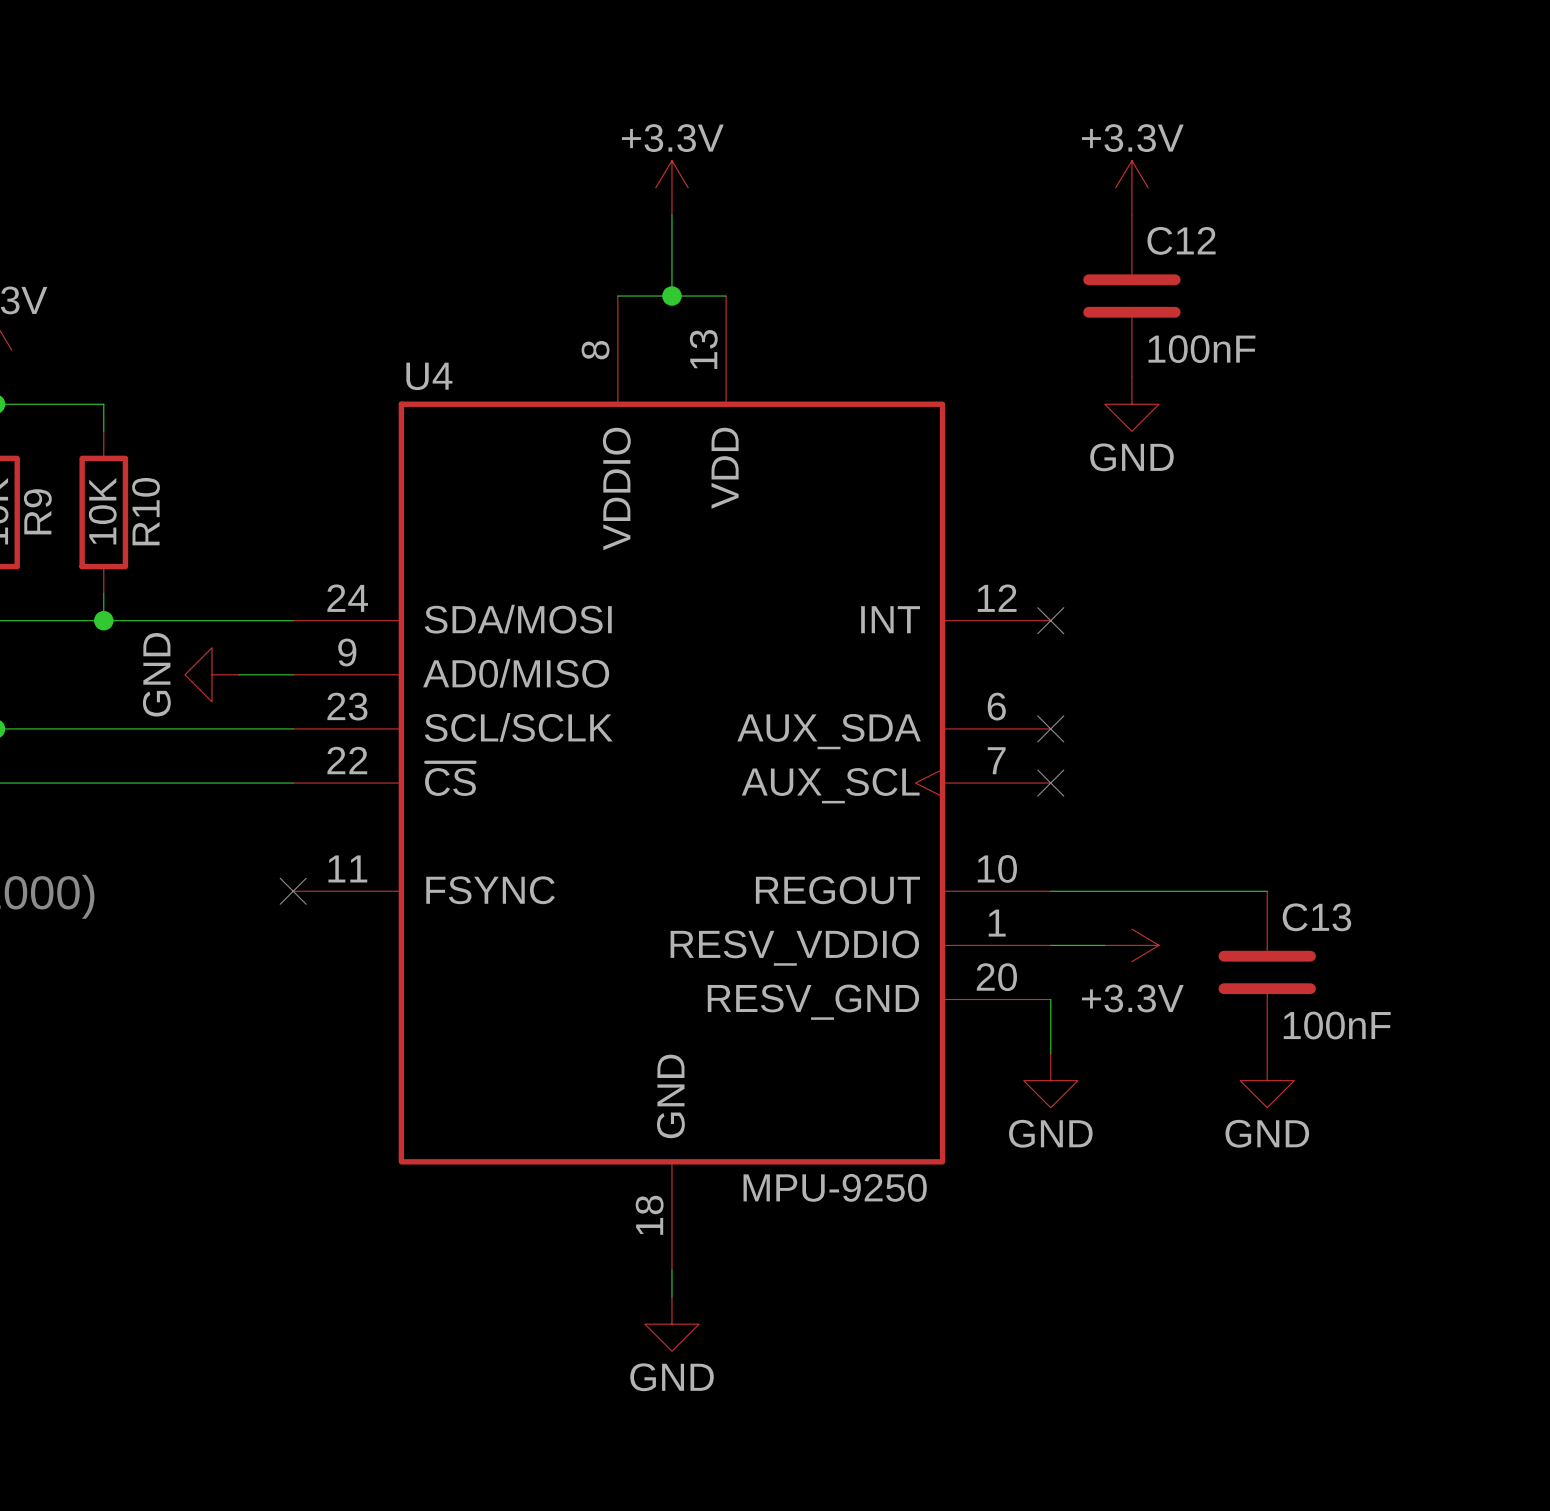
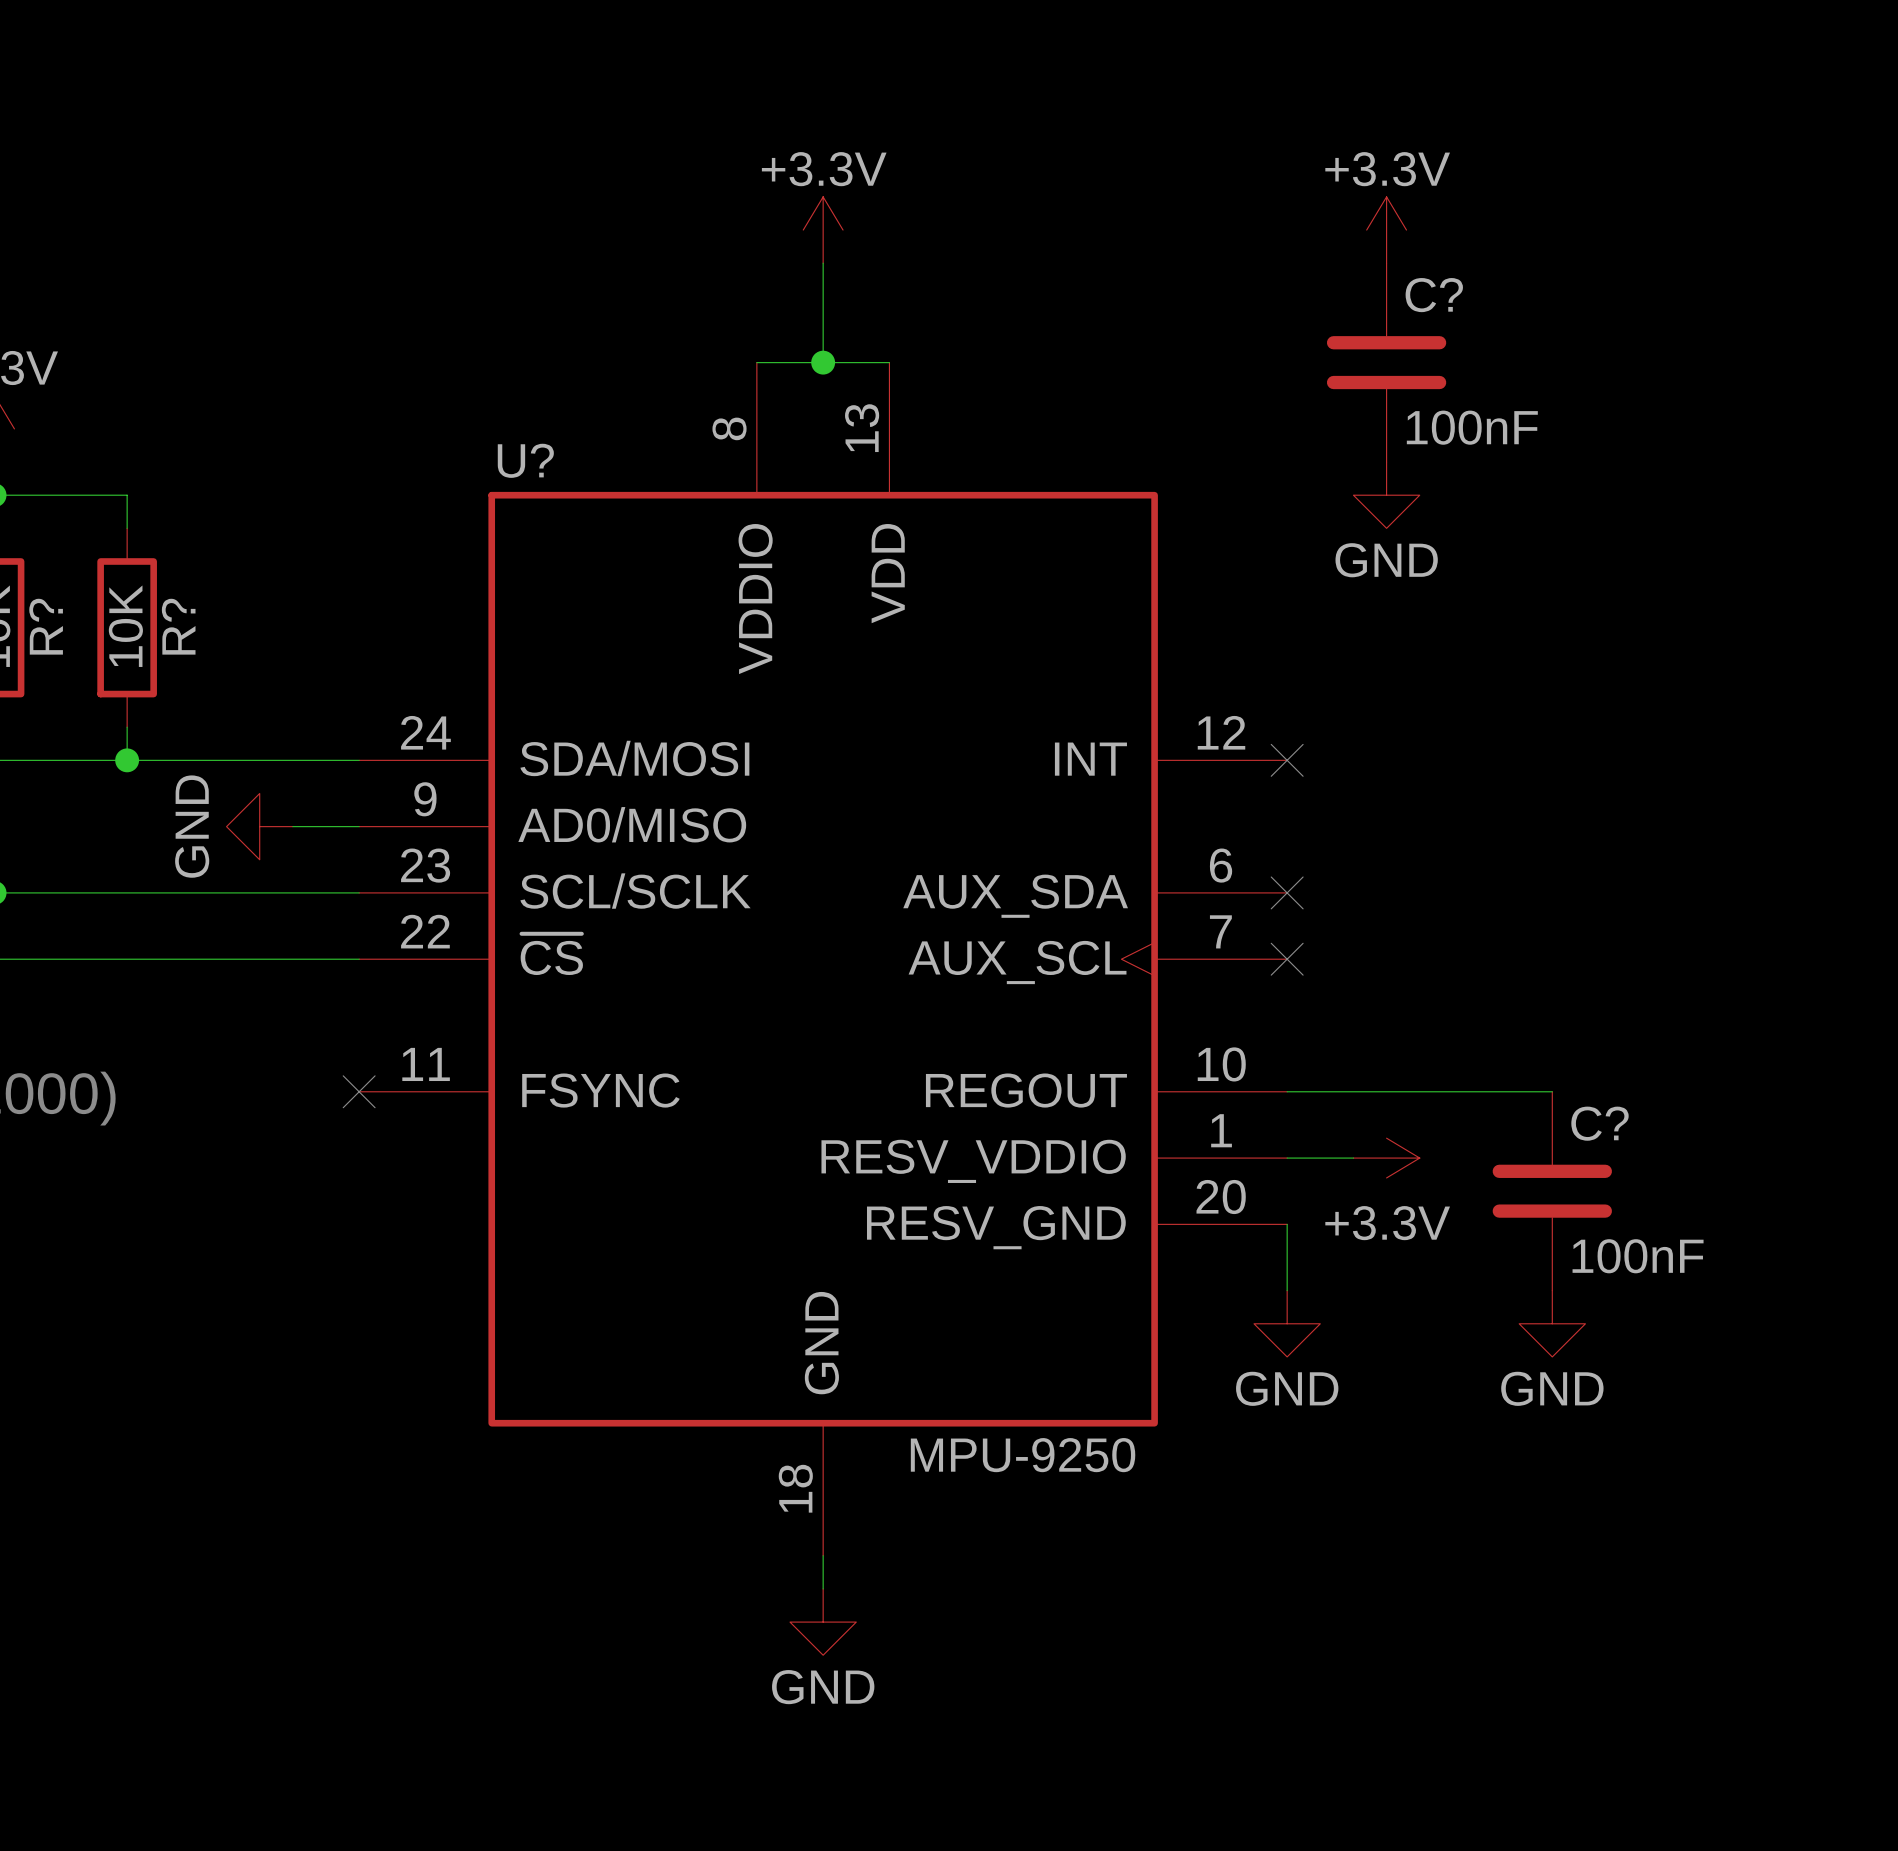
C12 name: C12 (1181, 240) -> C? (1434, 295)
U4 name: U4 (429, 376) -> U? (525, 460)
R9 name: R9 (37, 511) -> R? (46, 626)
R10 name: R10 (146, 511) -> R? (178, 626)
C13 name: C13 (1316, 917) -> C? (1600, 1123)

